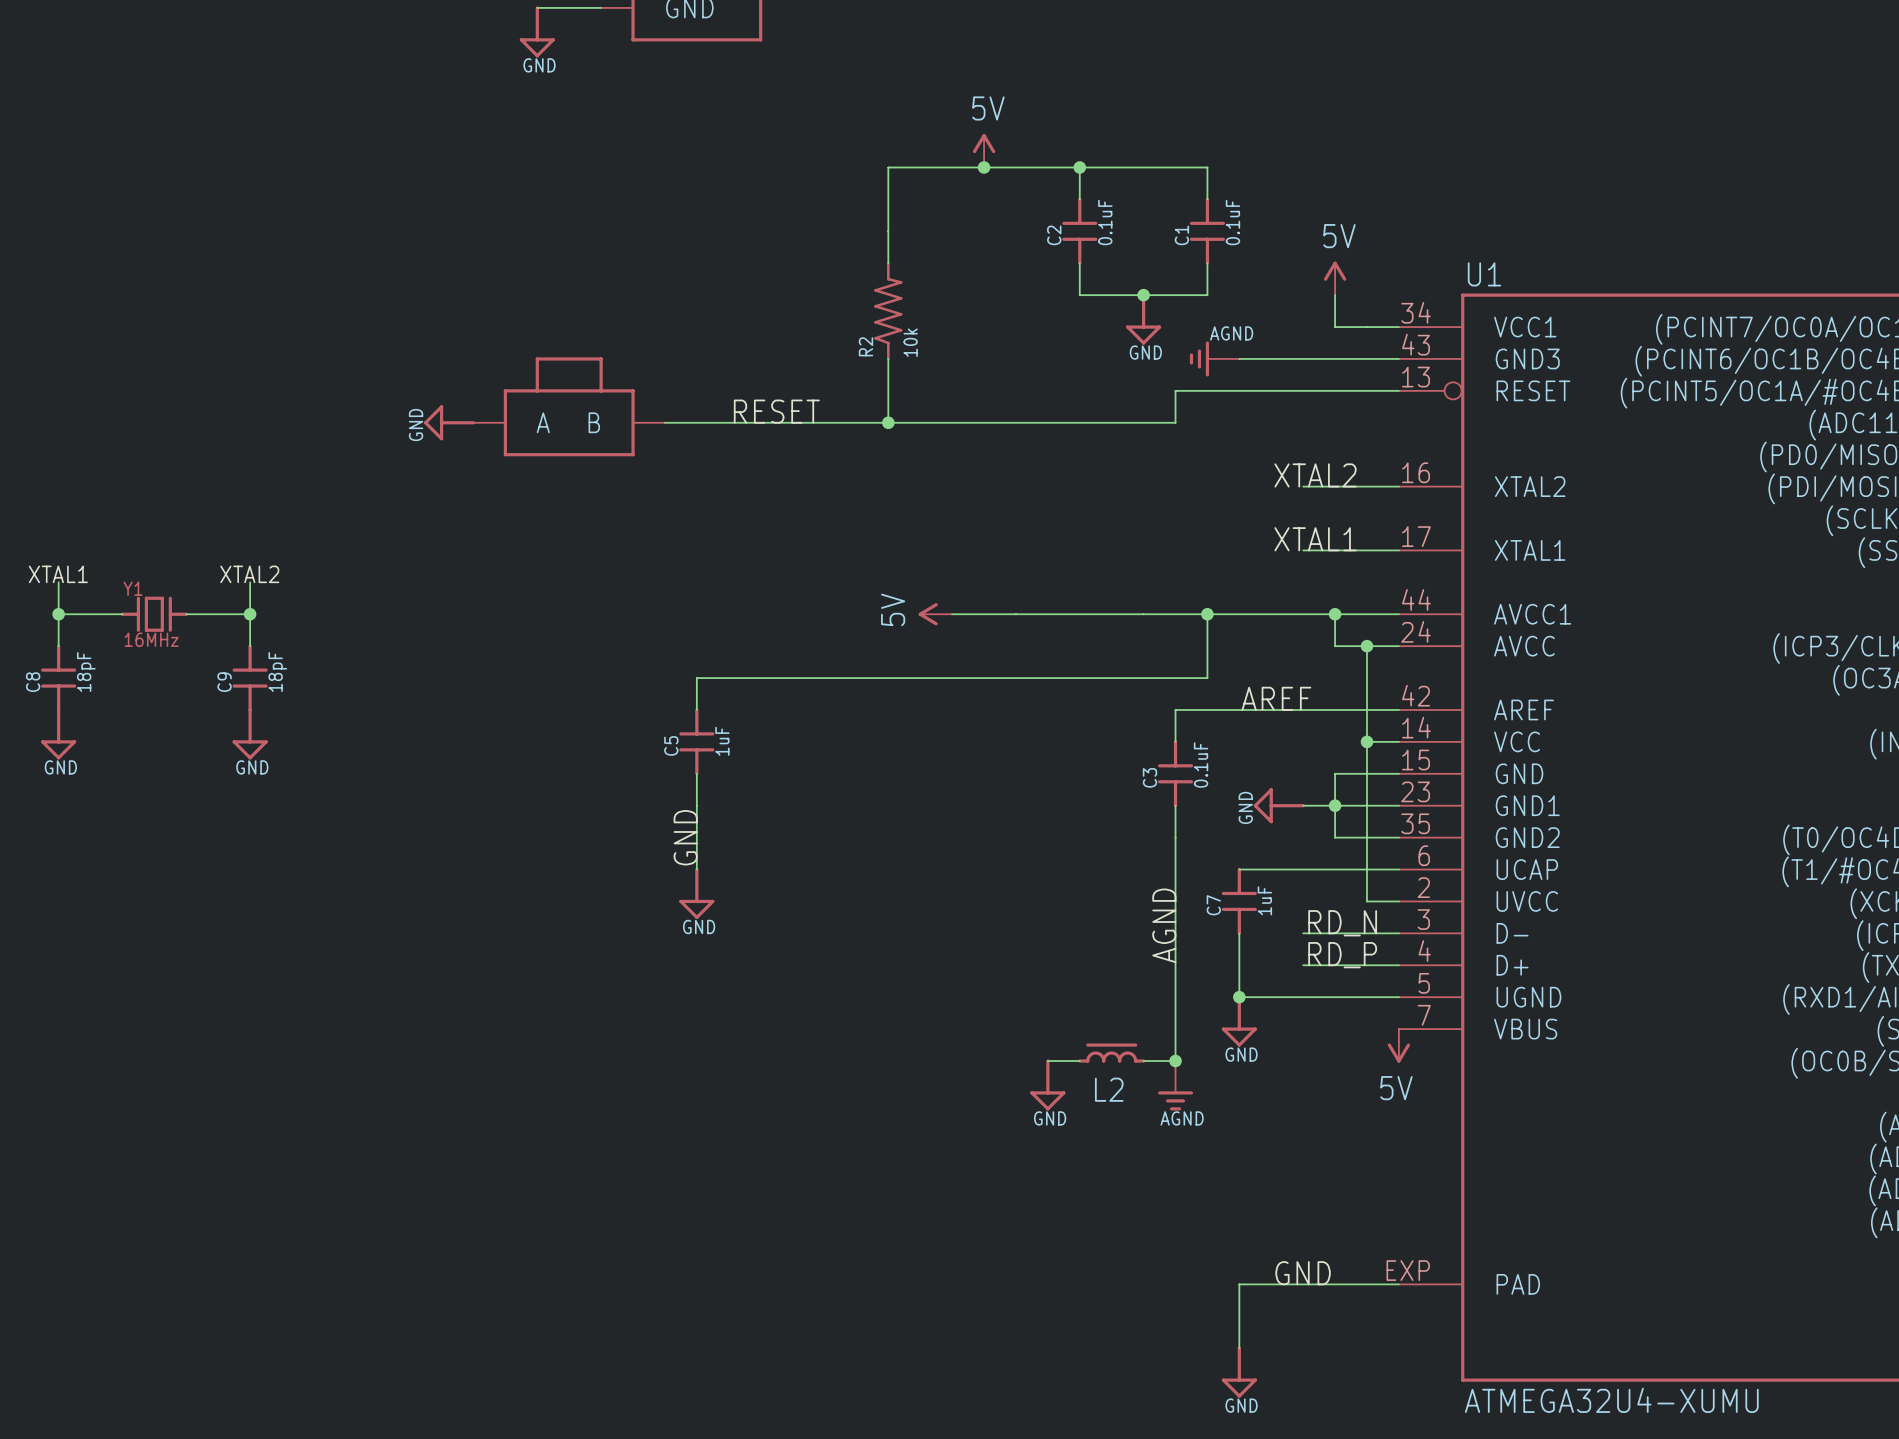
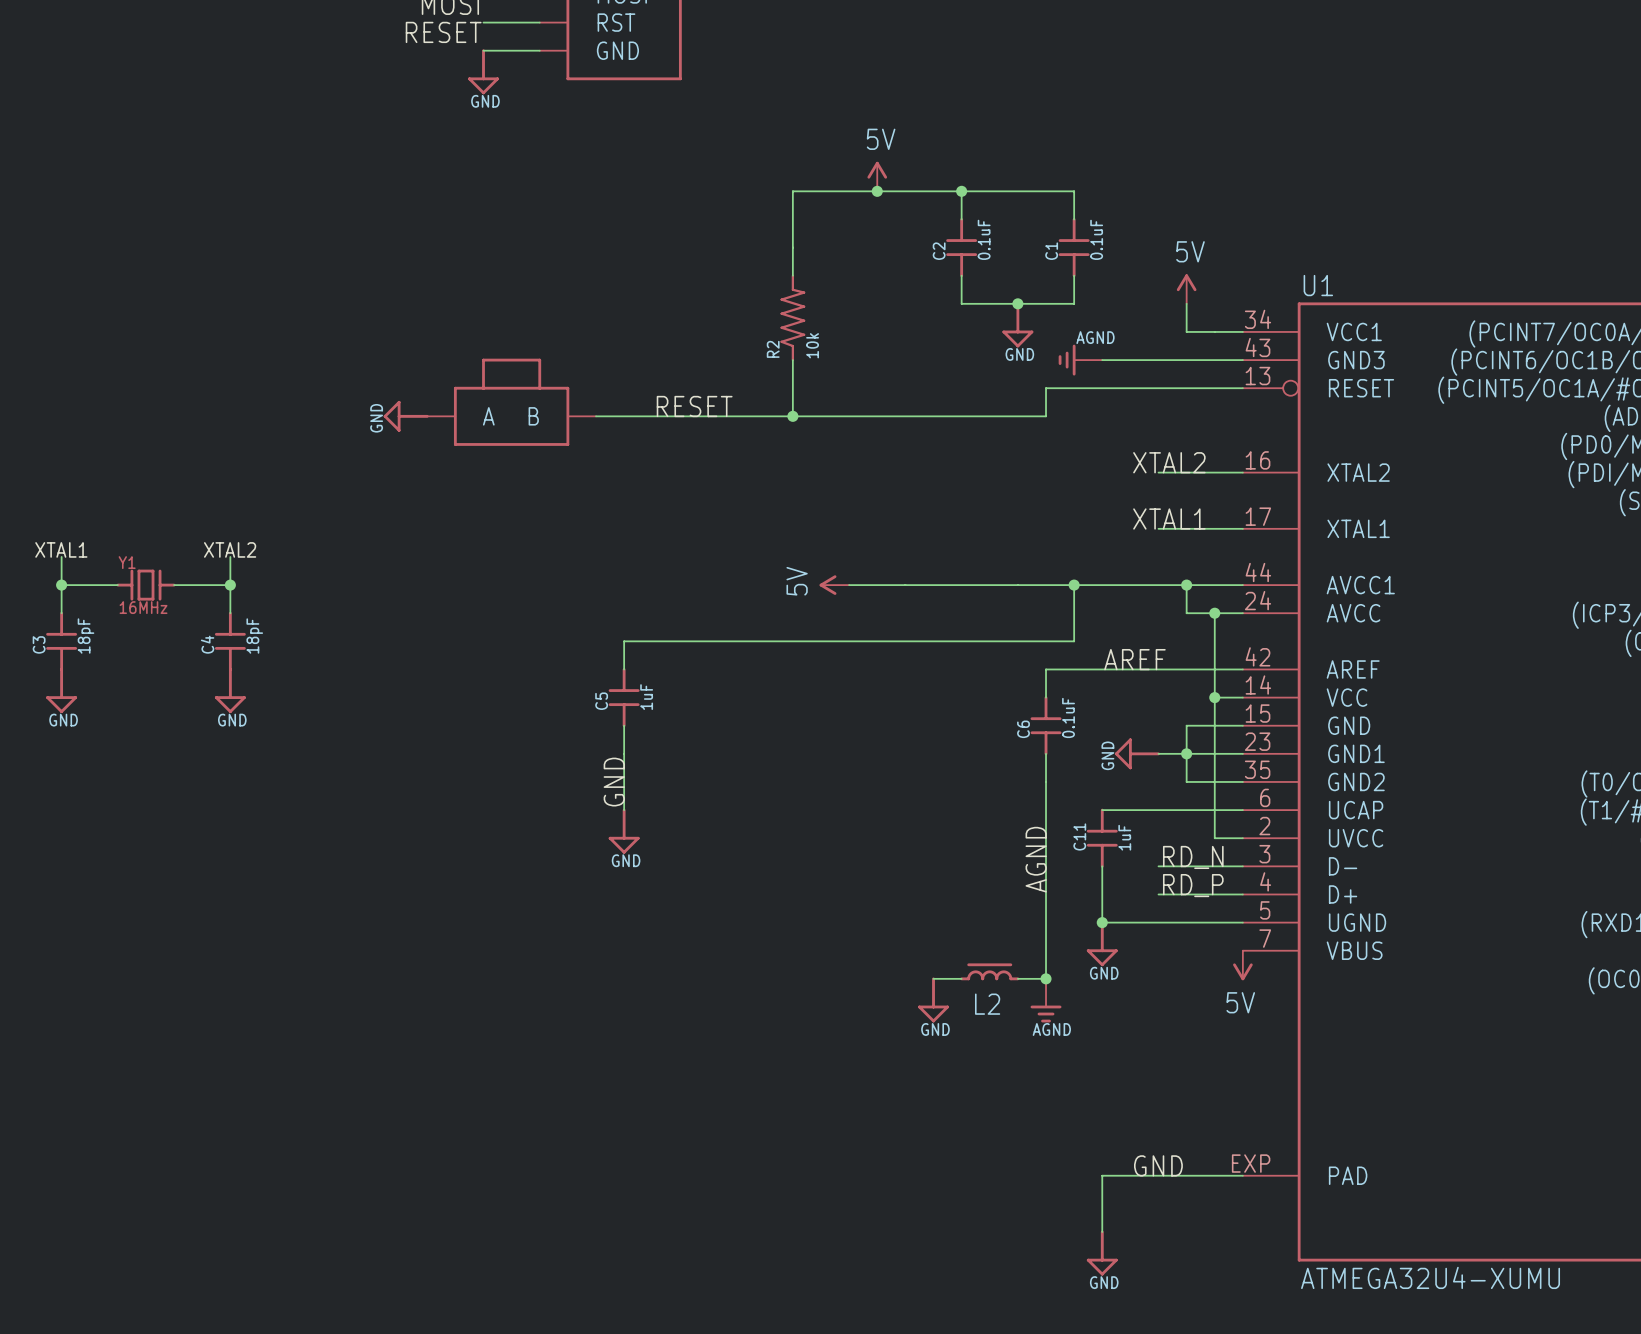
C8 name: C8 (33, 682) -> C3 (39, 644)
C9 name: C9 (224, 682) -> C4 (207, 644)
C3 name: C3 (1149, 777) -> C6 (1023, 729)
C7 name: C7 (1213, 905) -> C11 (1079, 836)

